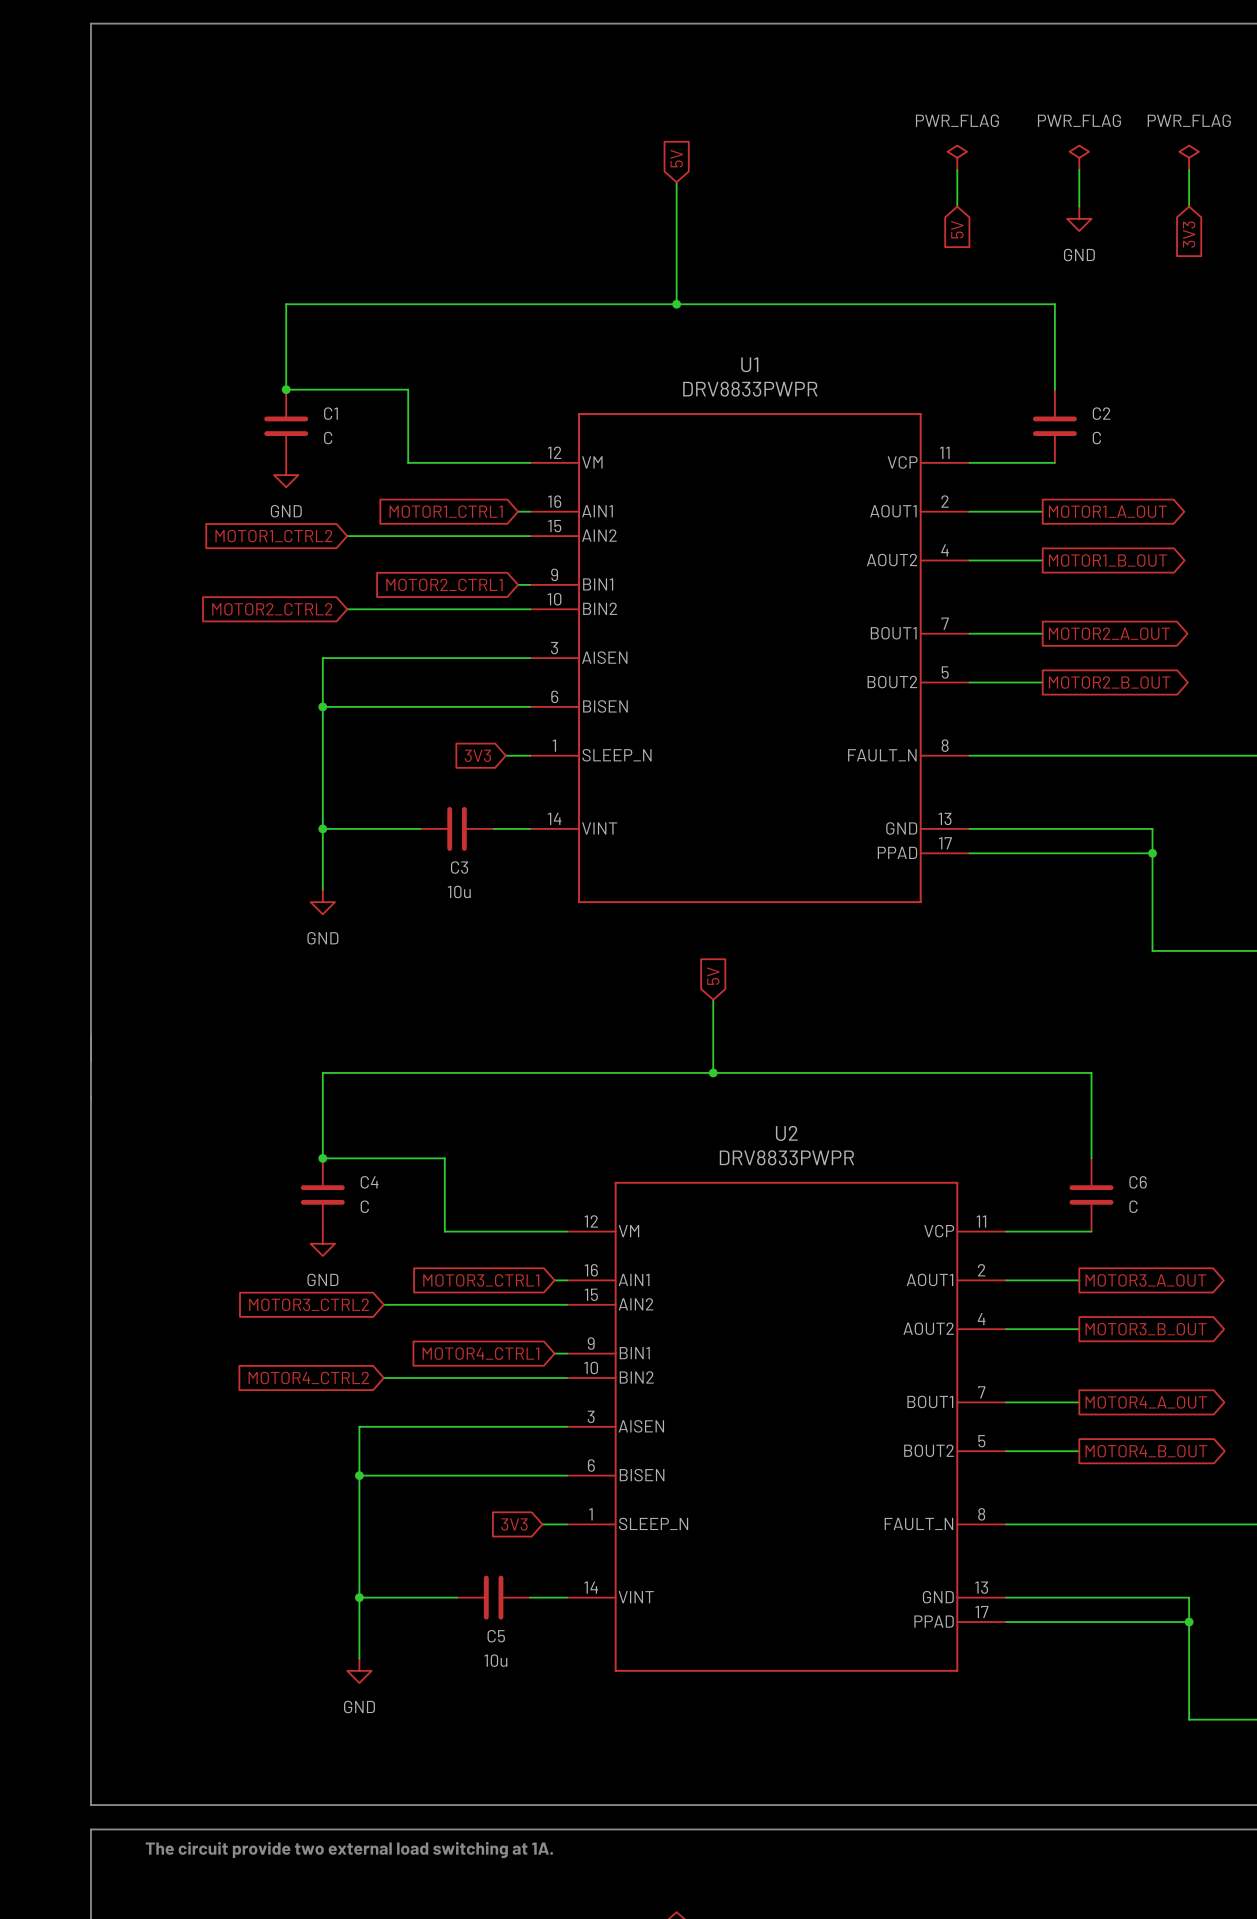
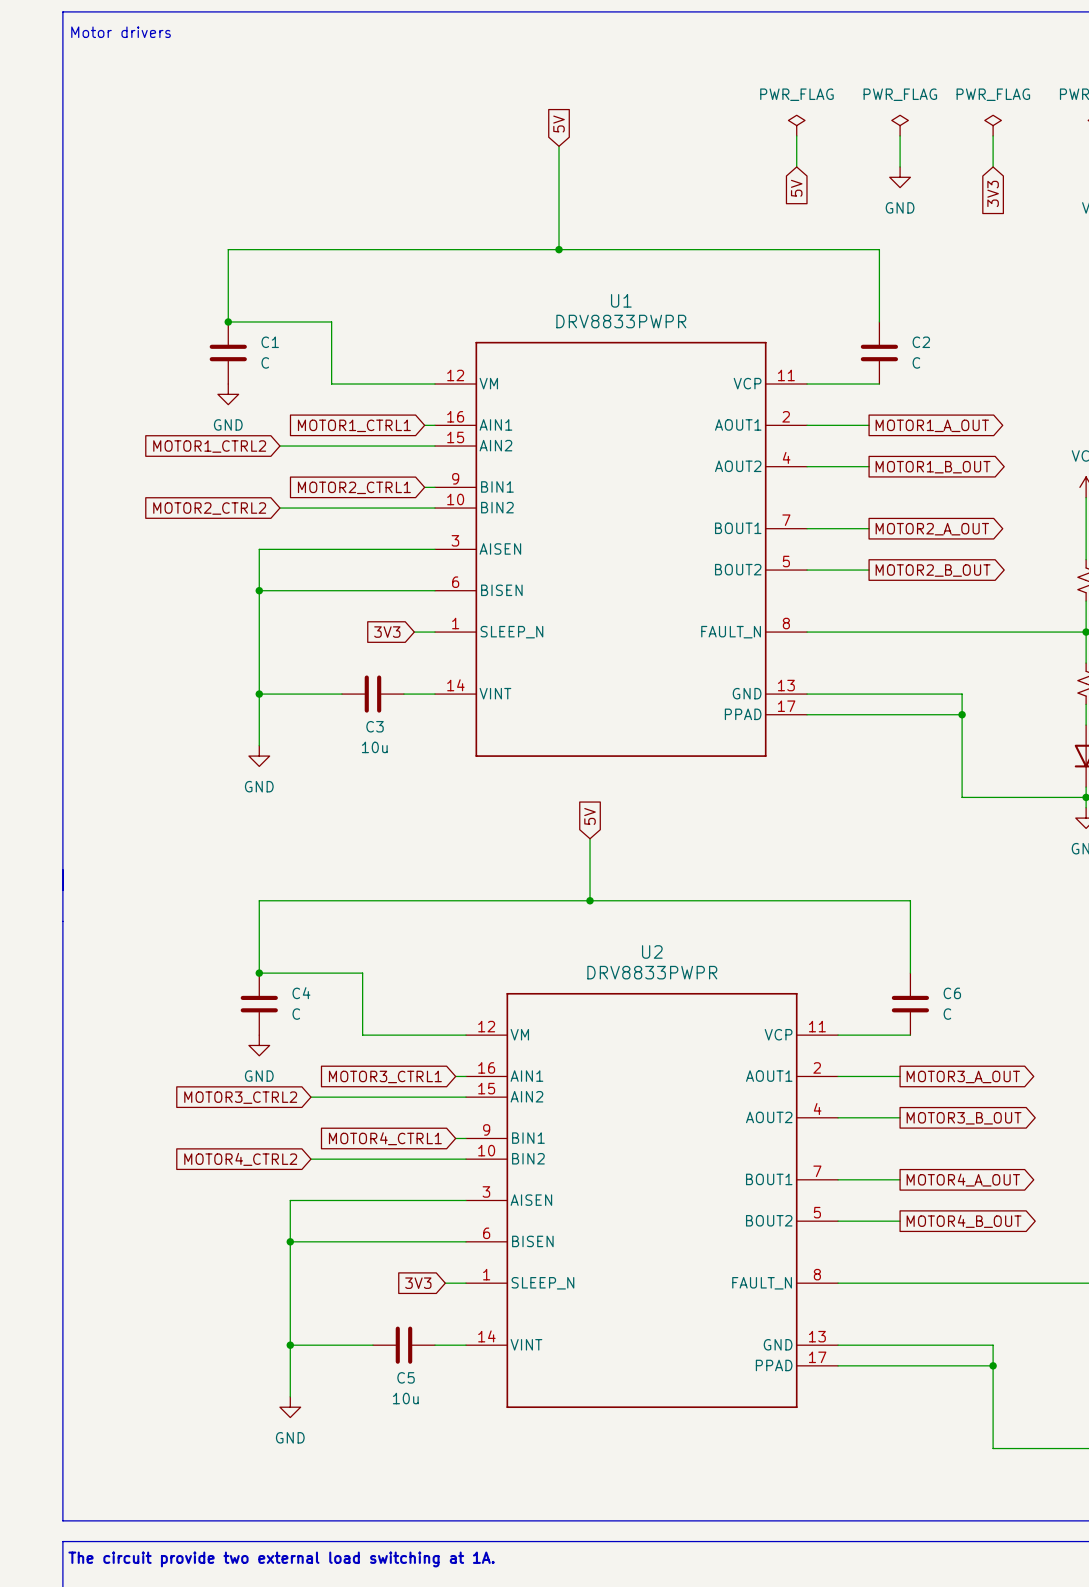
text: none -> Motor drivers (121, 32)

